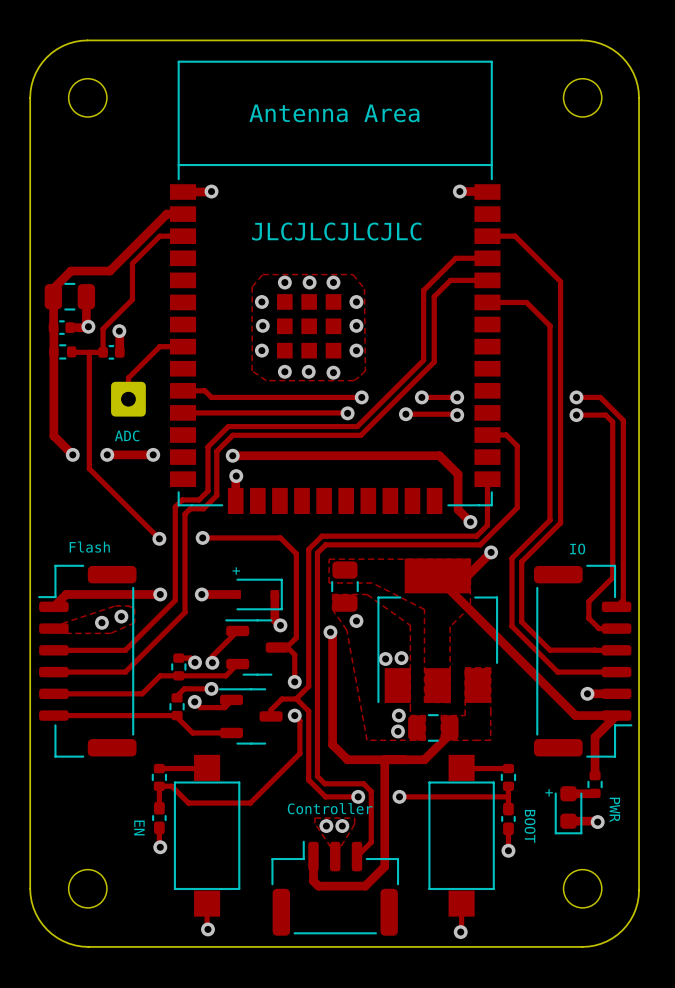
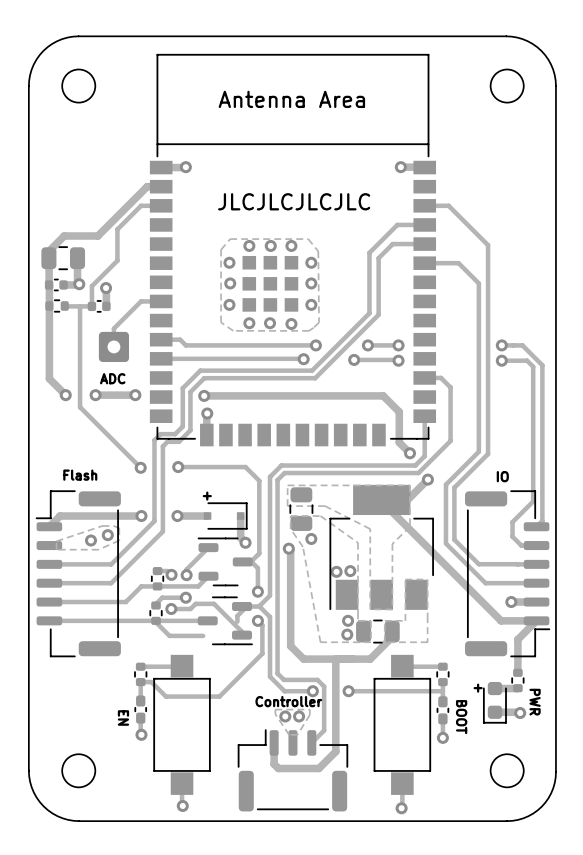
track: (231, 699) (224, 707) (200, 707) (194, 701) -> (242, 635) (242, 631) (214, 603) (195, 603) (190, 609) (171, 609)
track: (53, 715) (177, 715) -> (49, 620) (207, 620)
part rotation: 0° (250, 716) -> 180° (225, 620)

